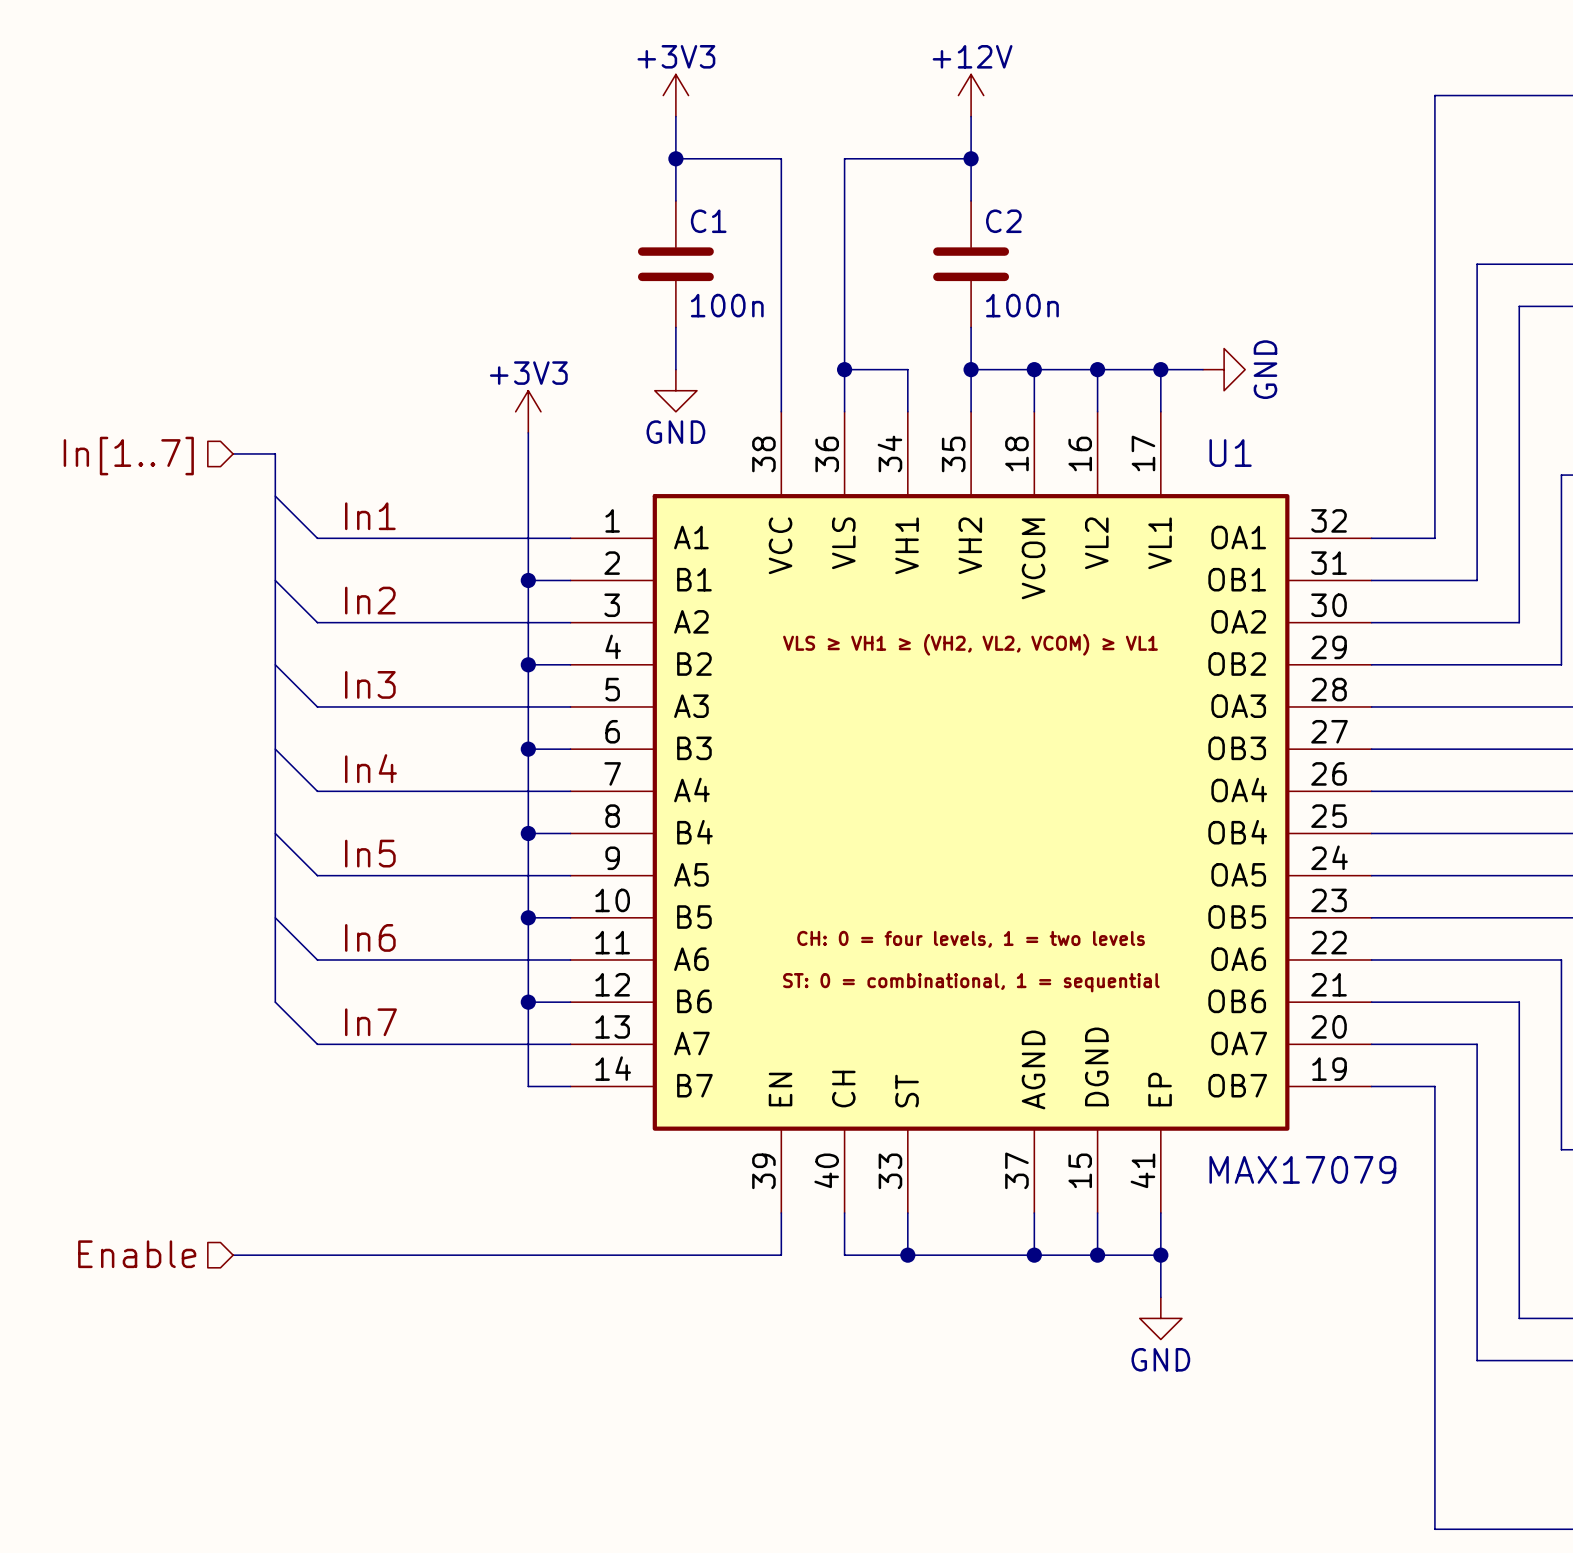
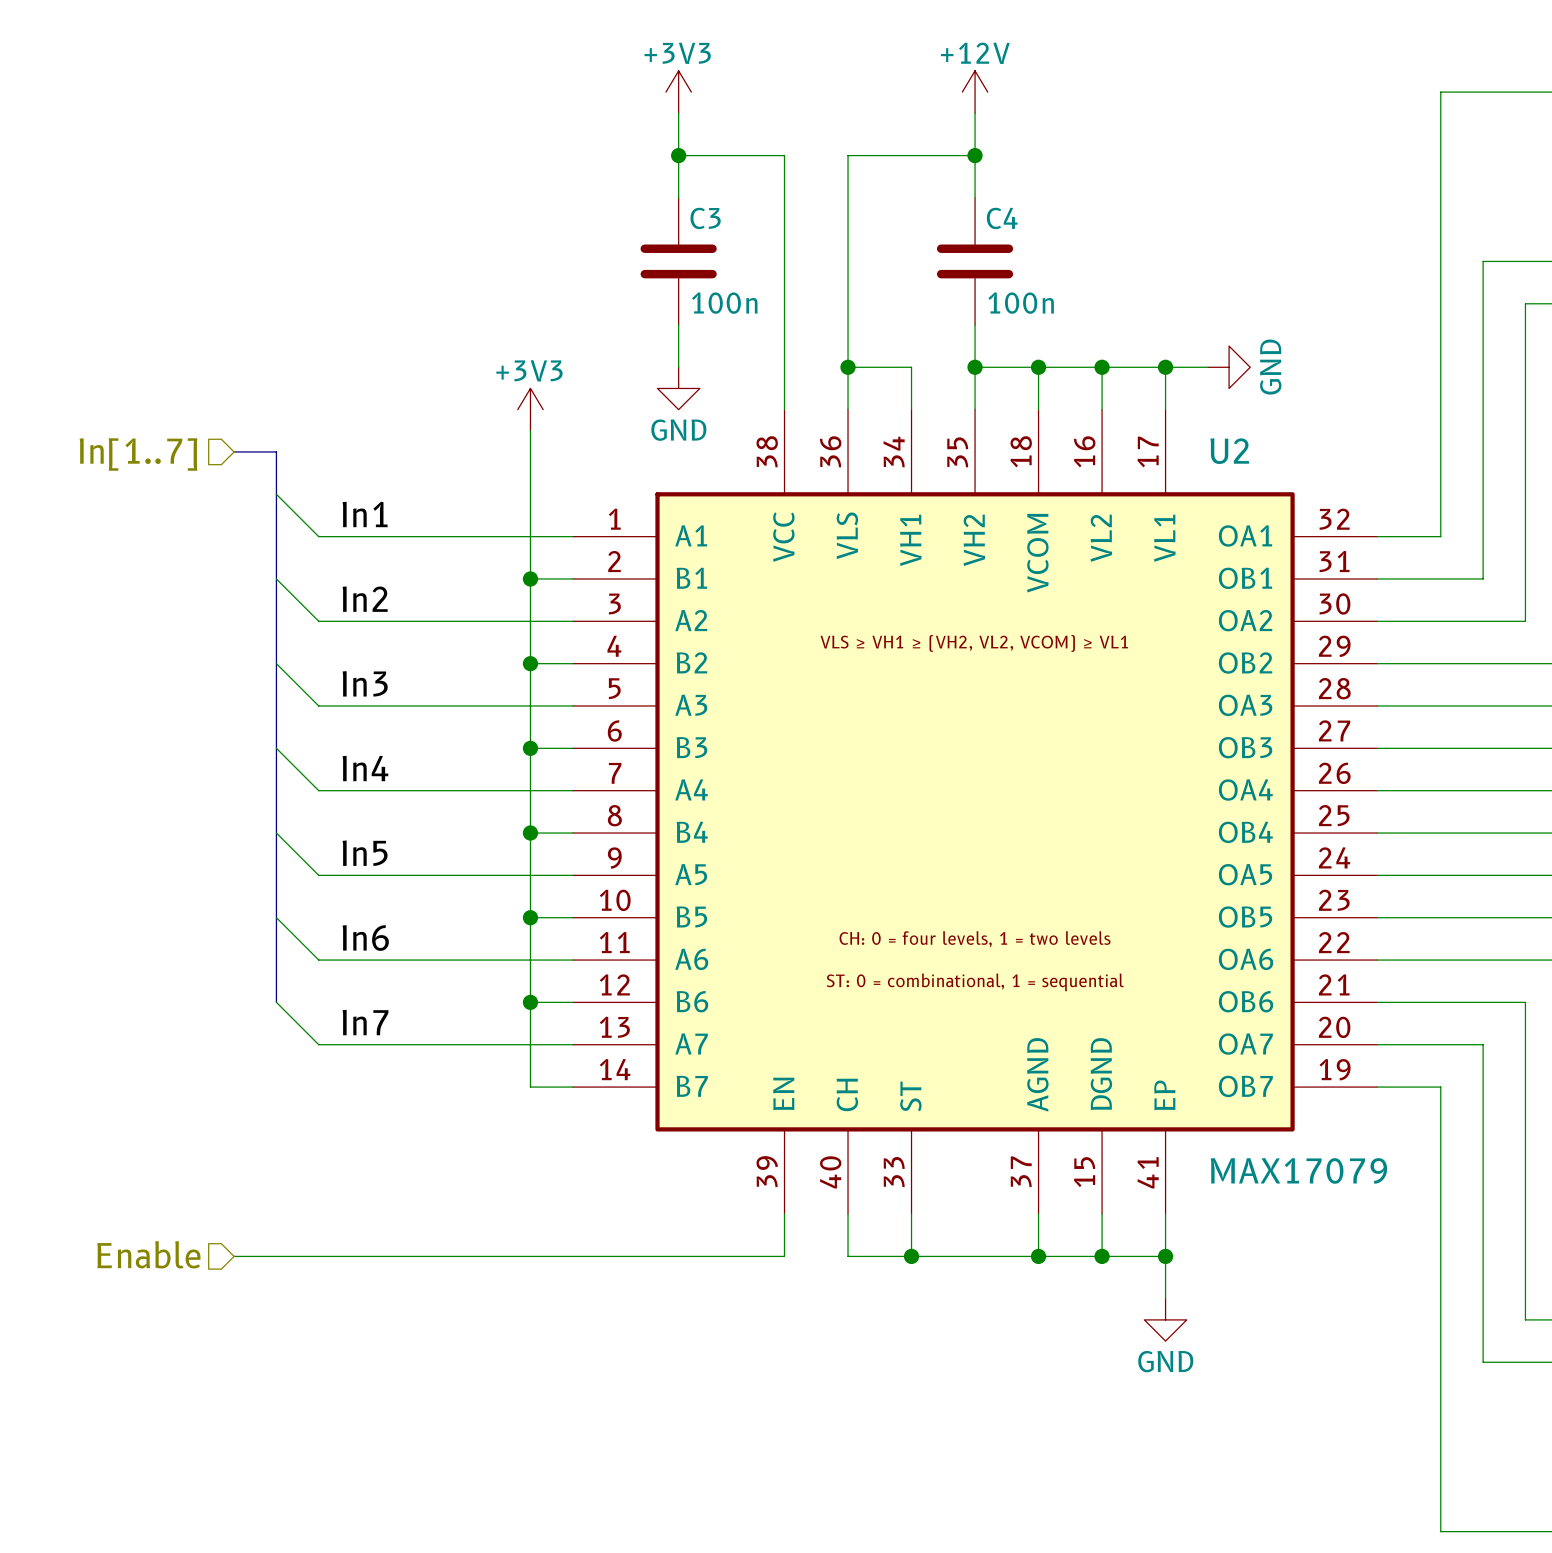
C1 name: C1 (708, 221) -> C3 (705, 218)
C2 name: C2 (1003, 221) -> C4 (1002, 218)
U1 name: U1 (1230, 453) -> U2 (1229, 451)

